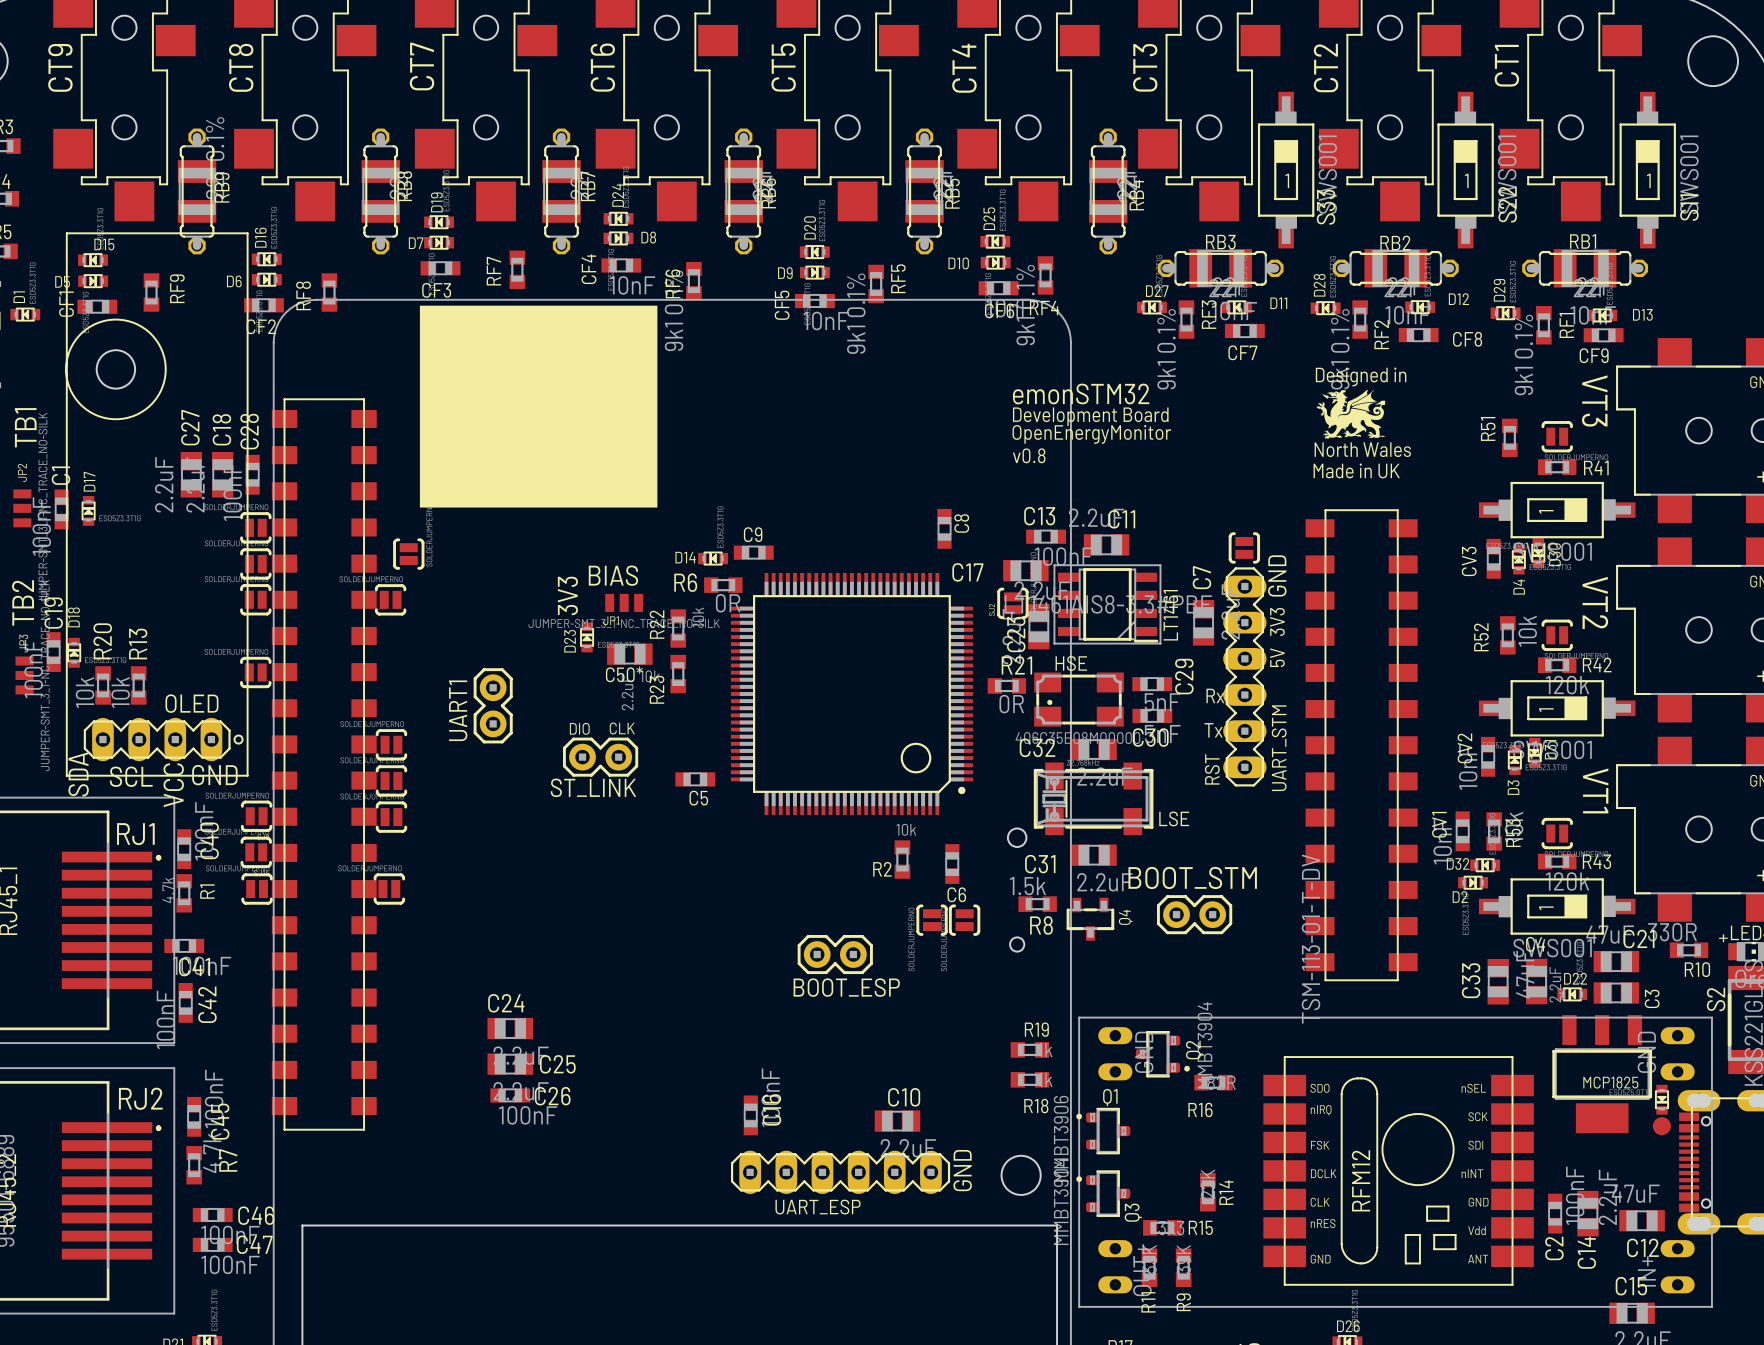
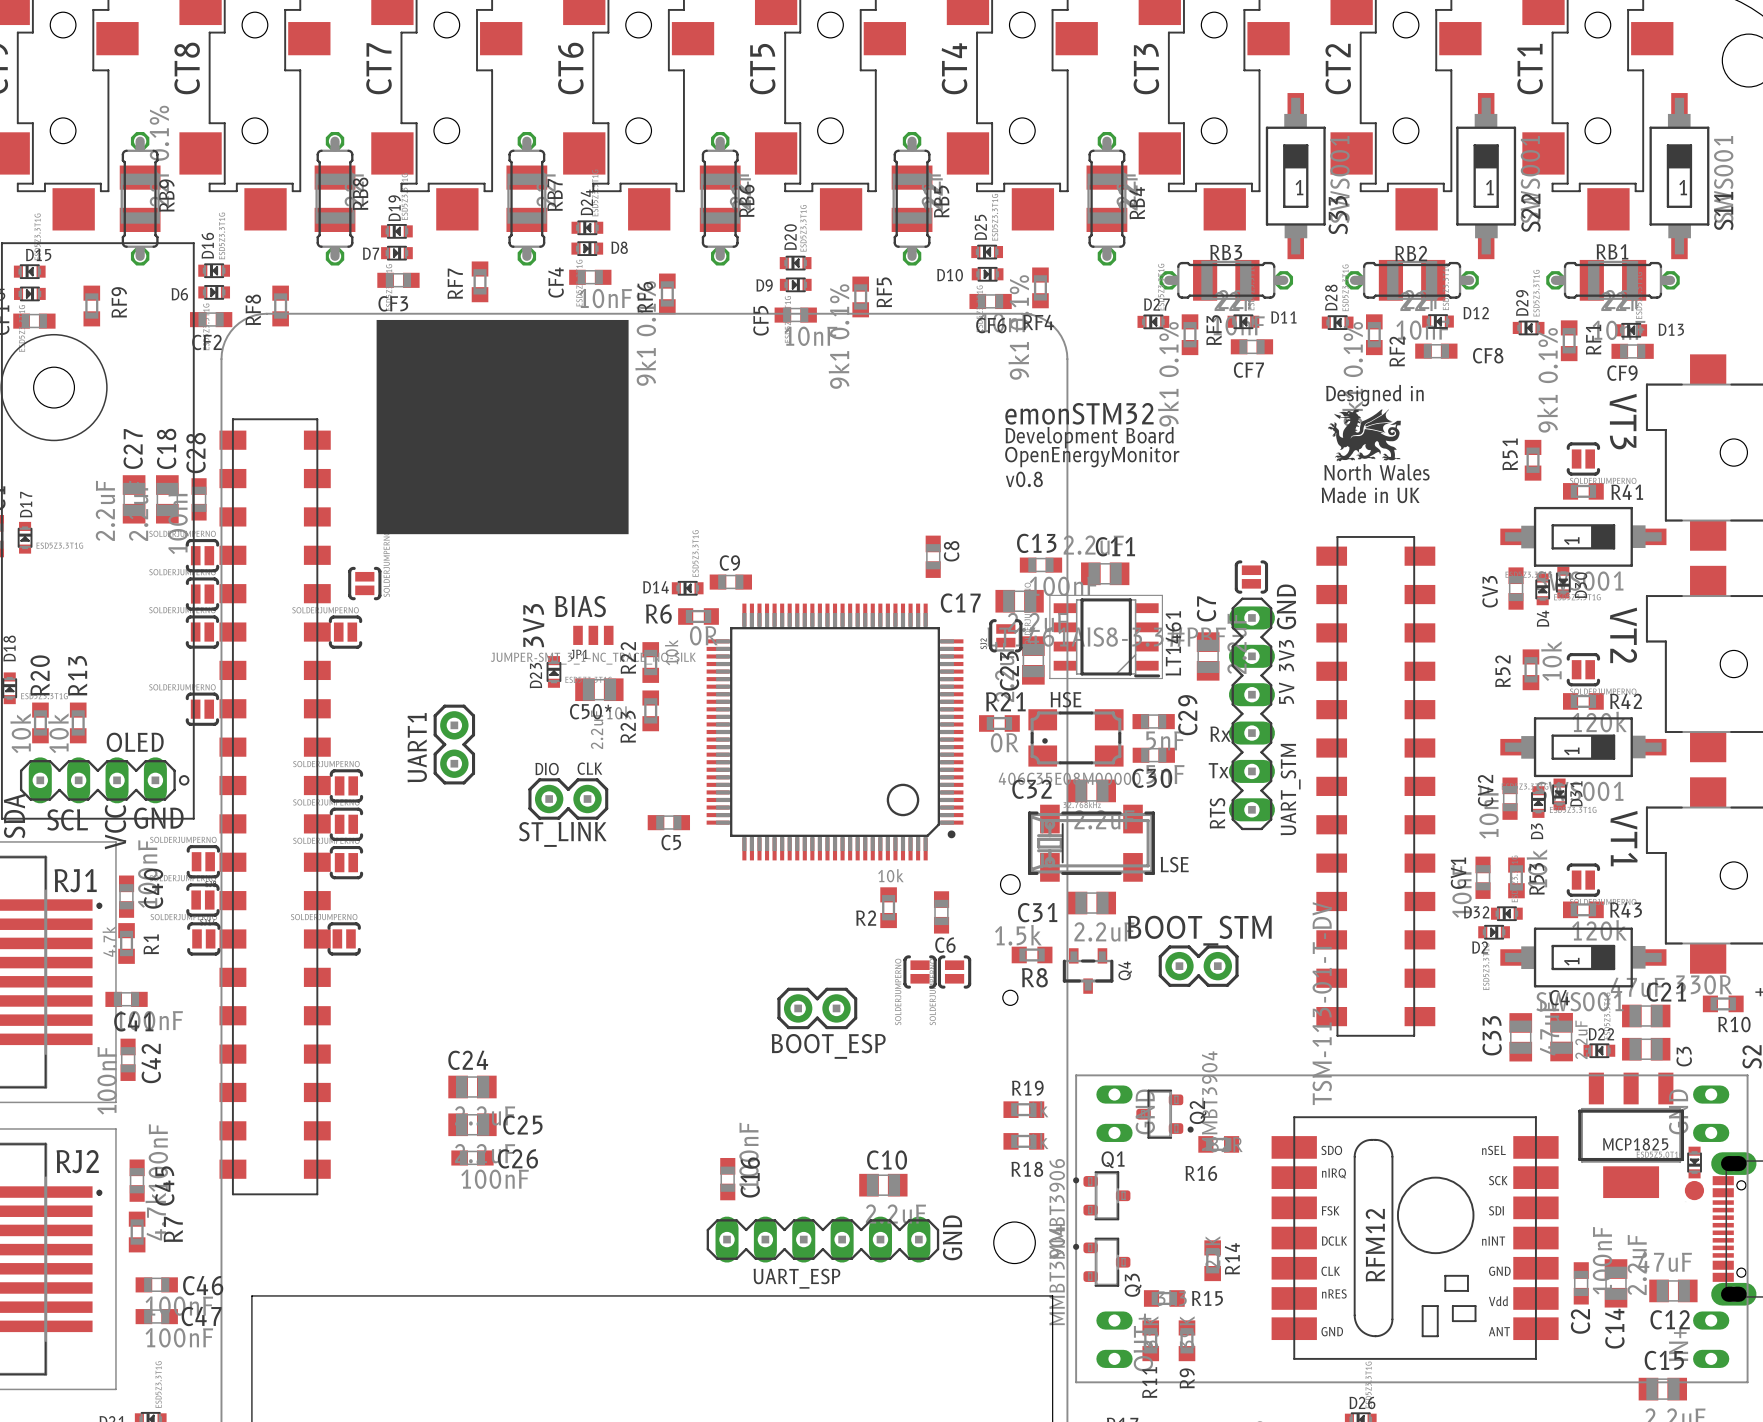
text: RST (1212, 769) -> RTS (1217, 813)

